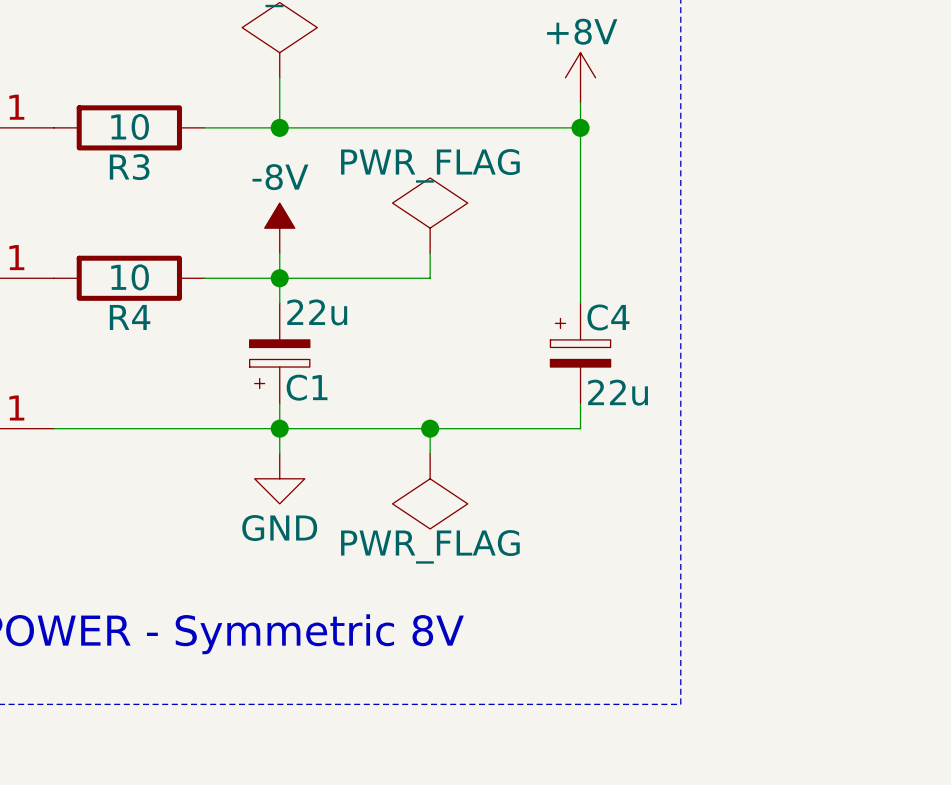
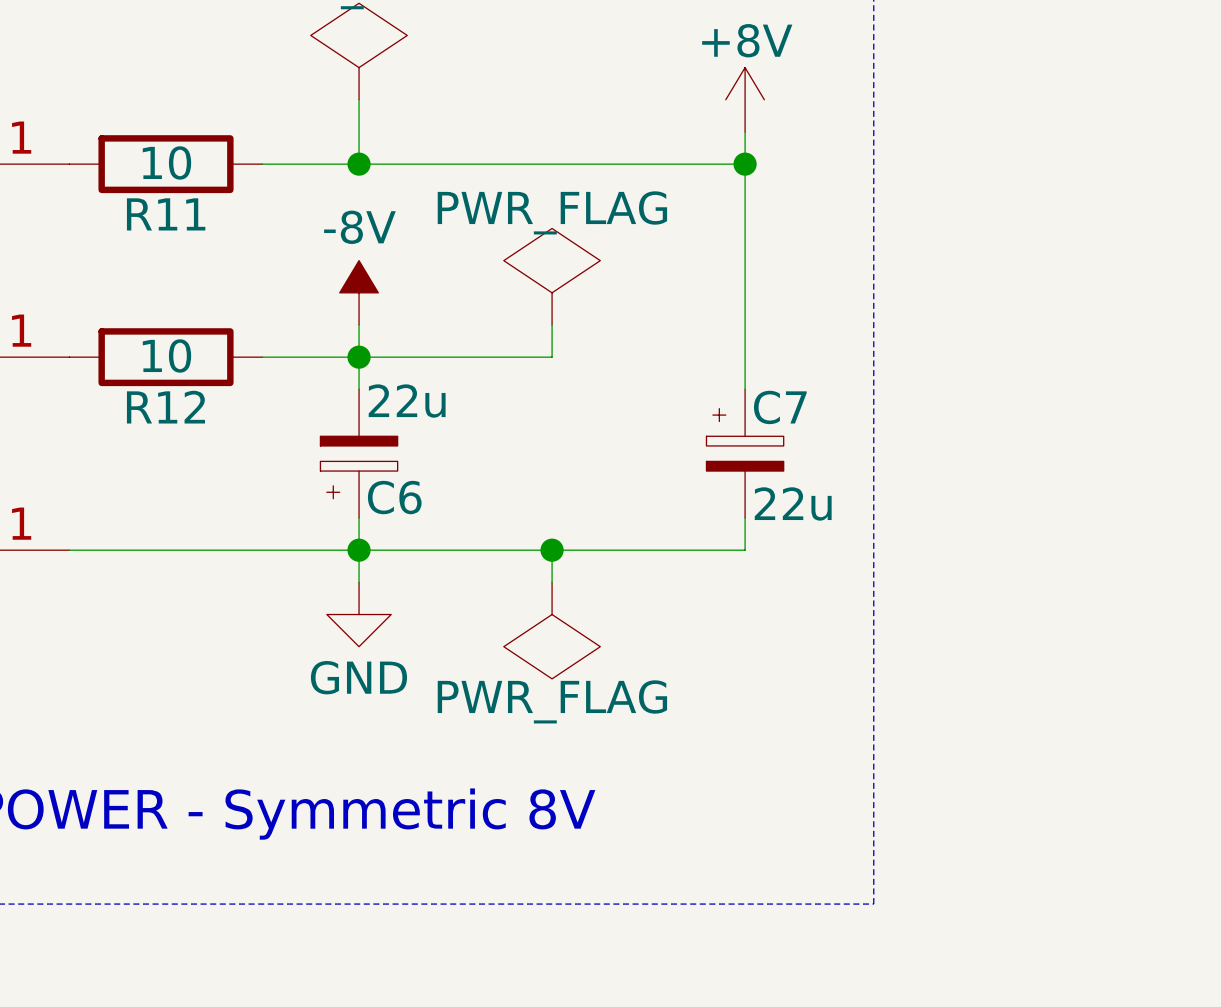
R3 name: R3 (129, 167) -> R11 (166, 214)
R4 name: R4 (130, 317) -> R12 (165, 407)
C4 name: C4 (608, 317) -> C7 (780, 407)
C1 name: C1 (307, 387) -> C6 (394, 497)

